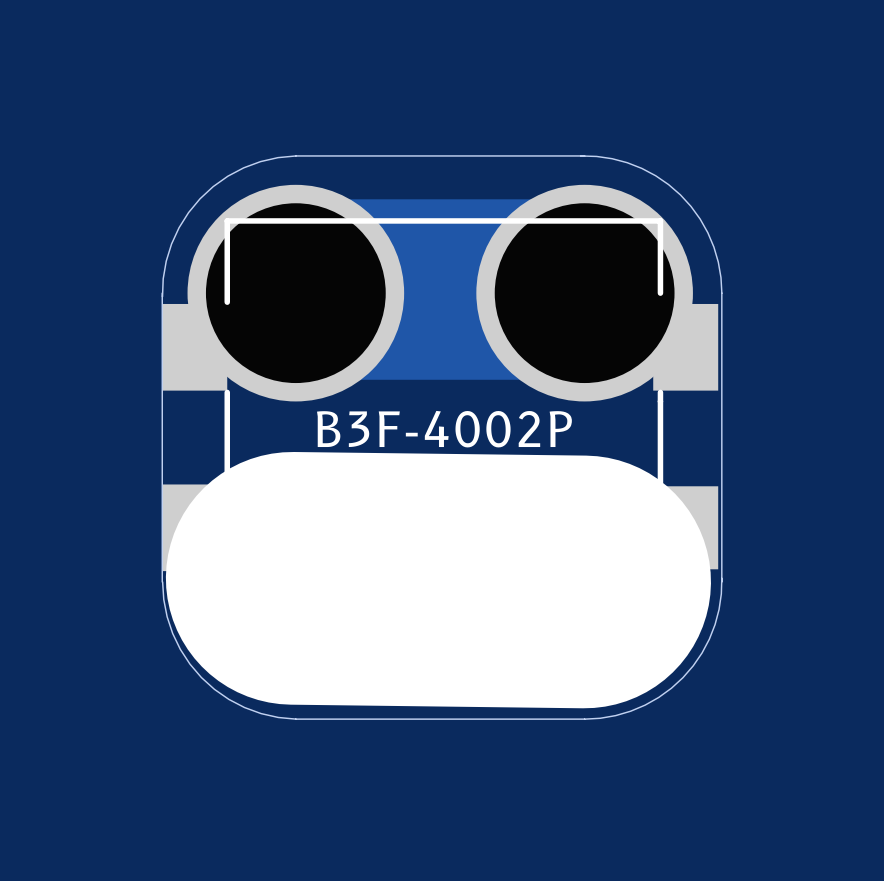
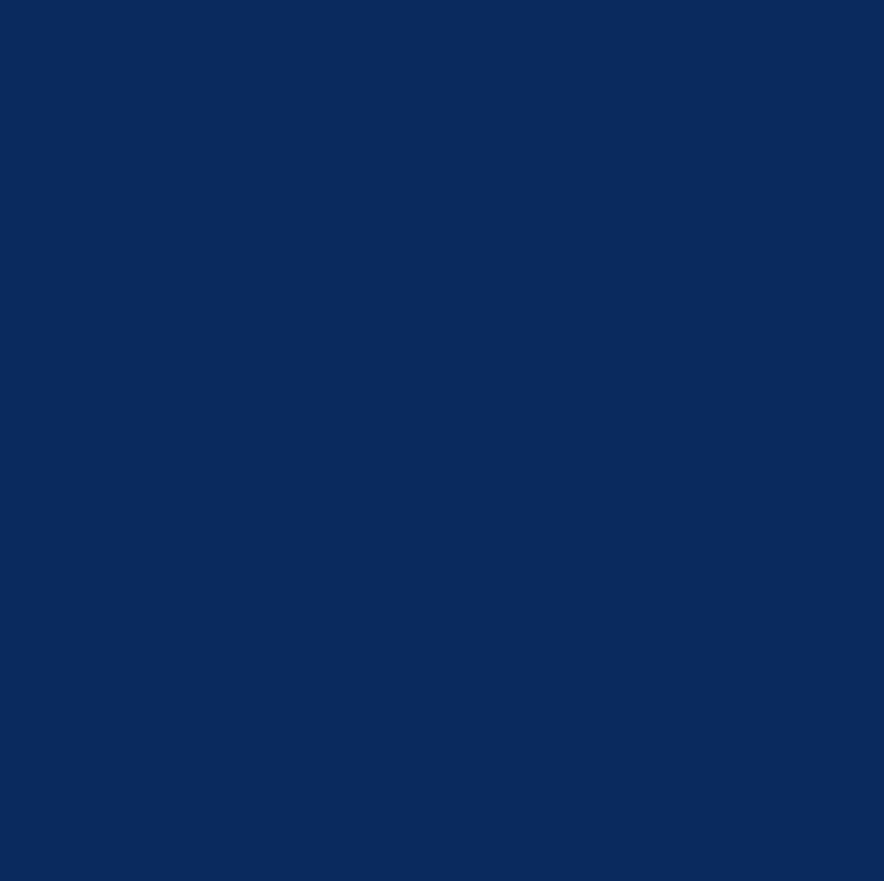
part: (442, 437) -> none

